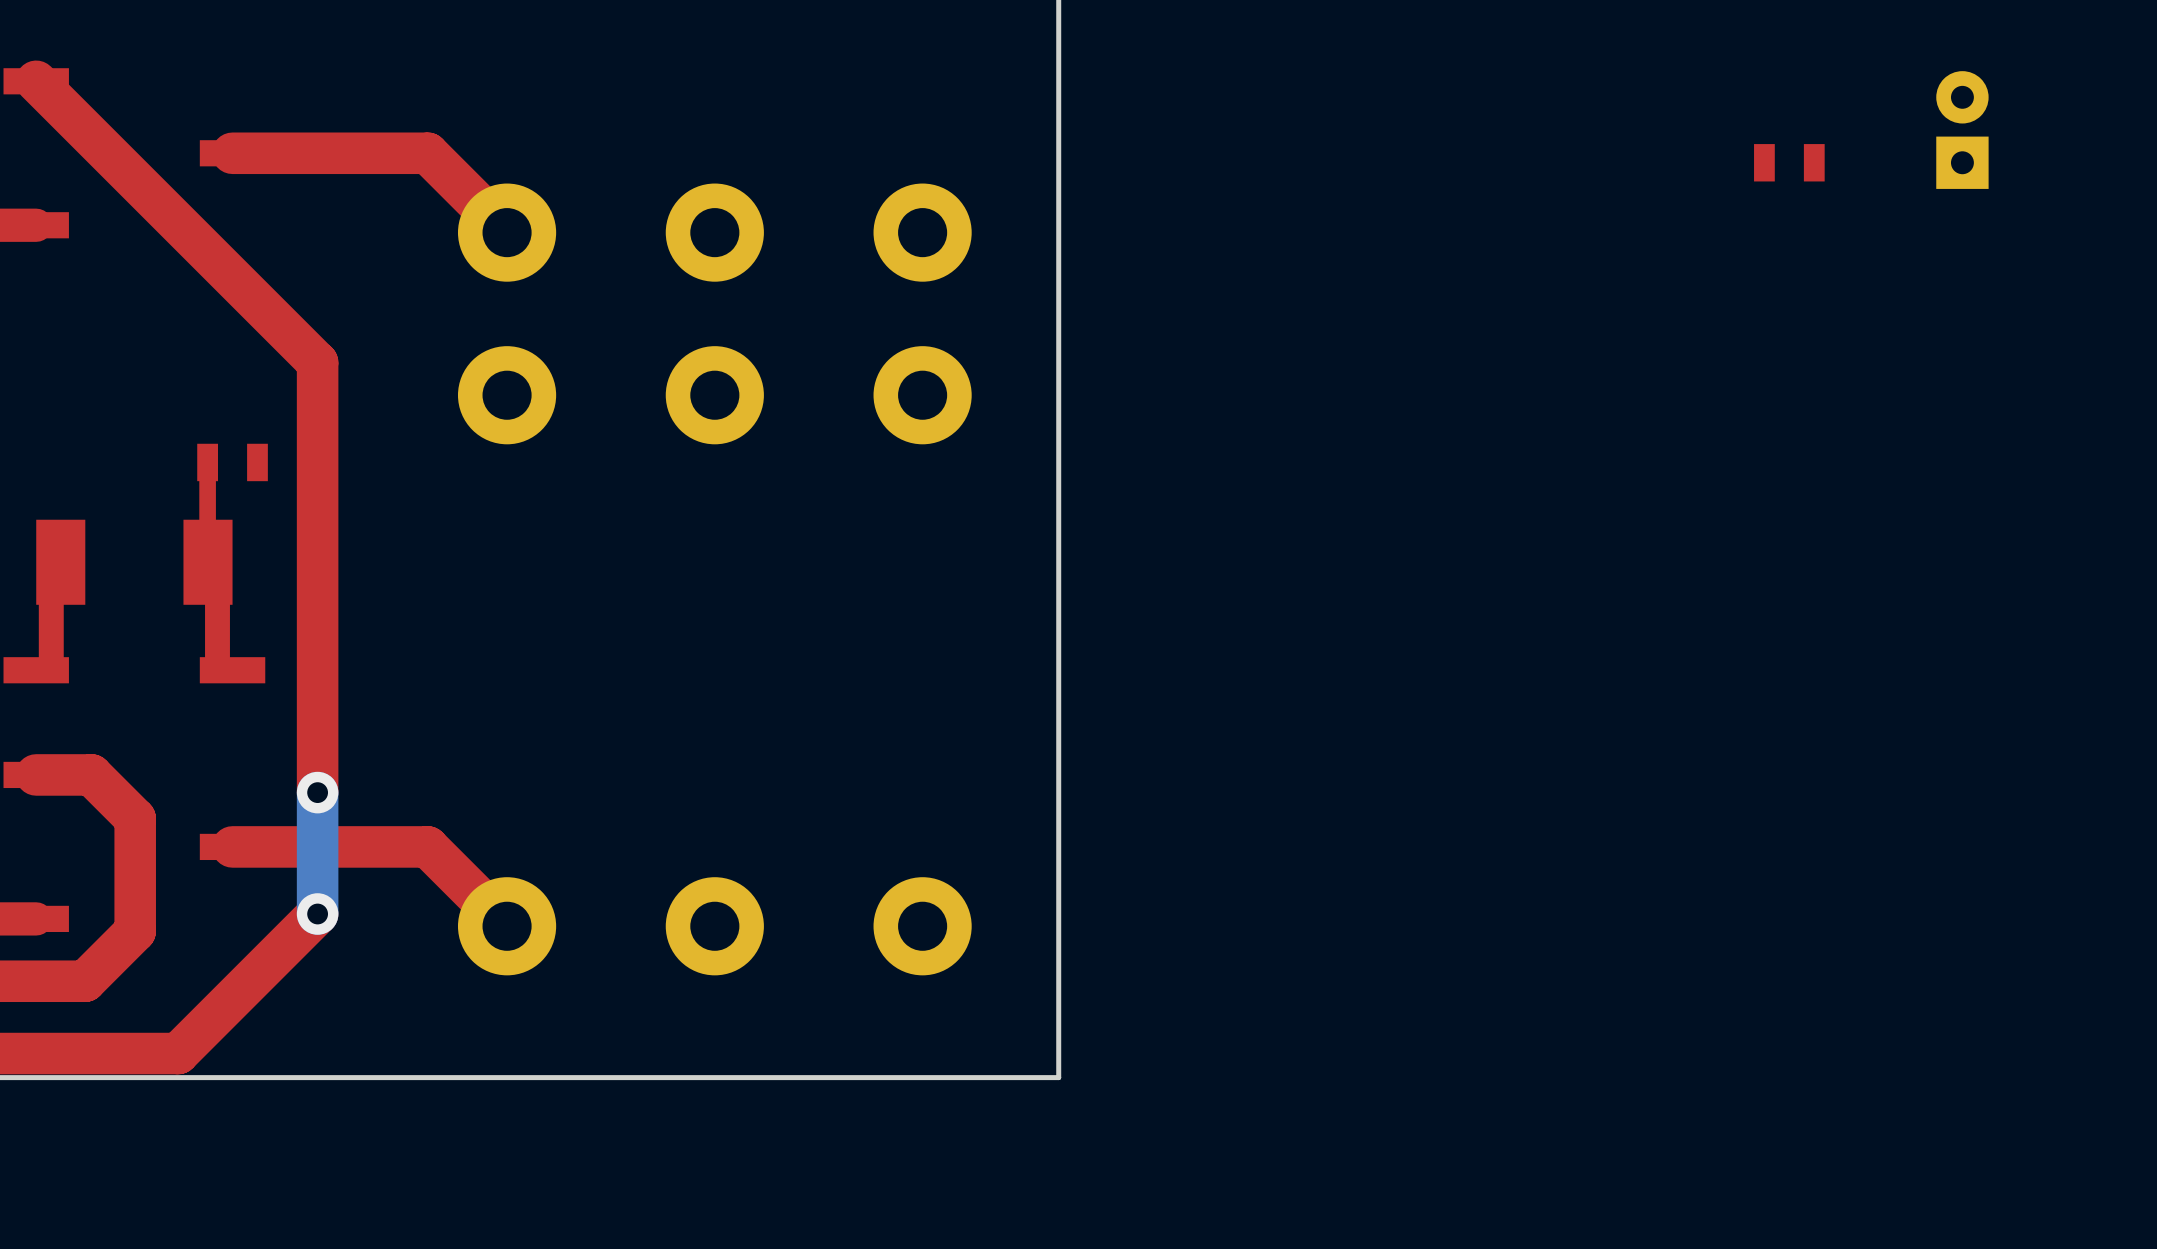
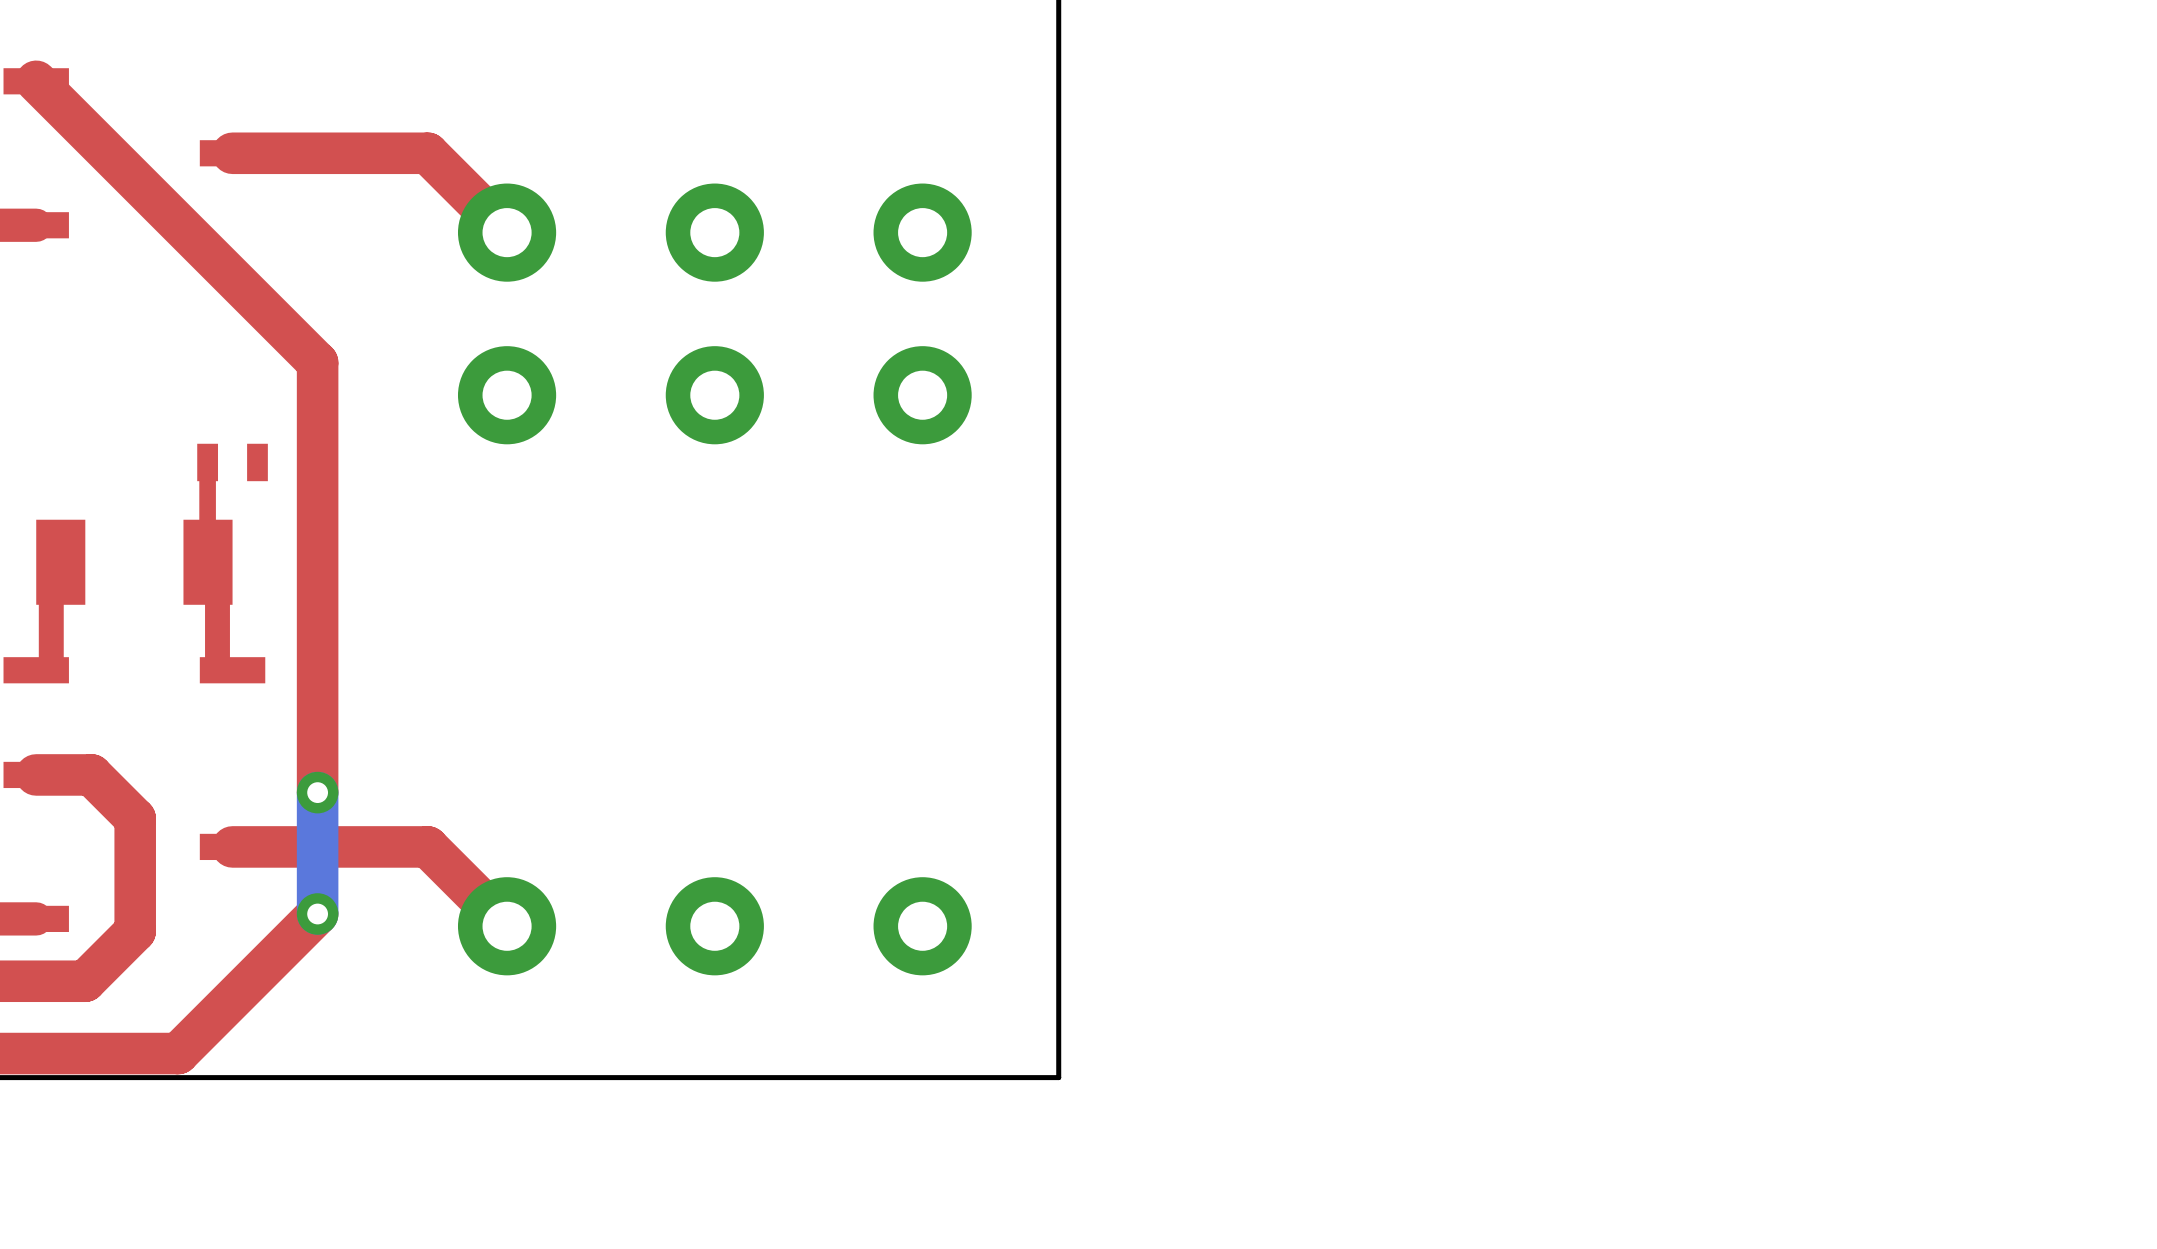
part: (1962, 130) -> none
part: (1789, 162) -> none

